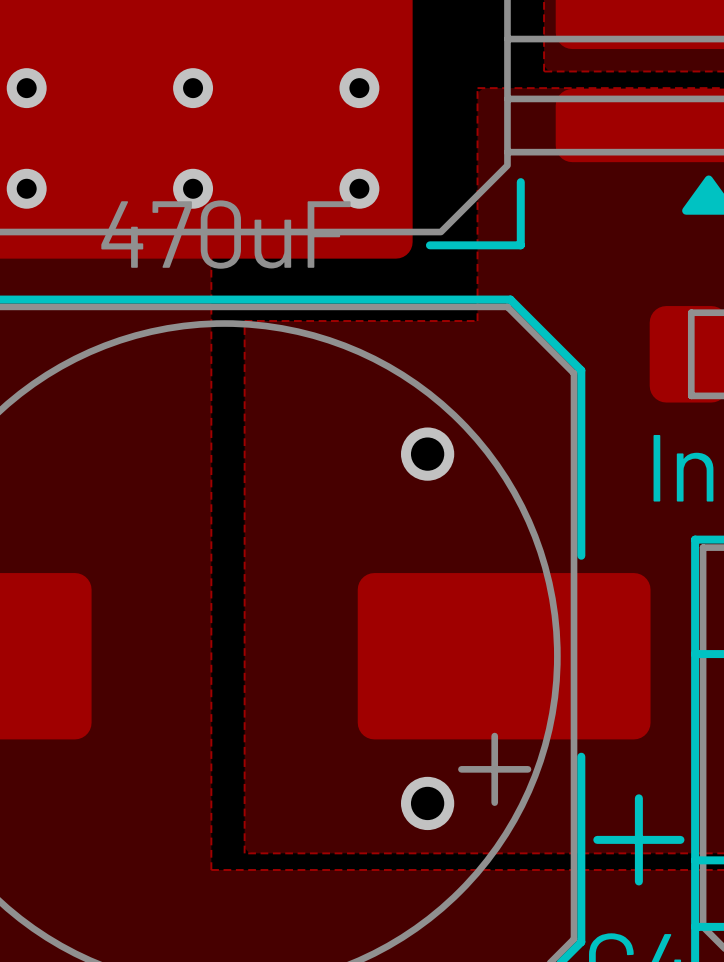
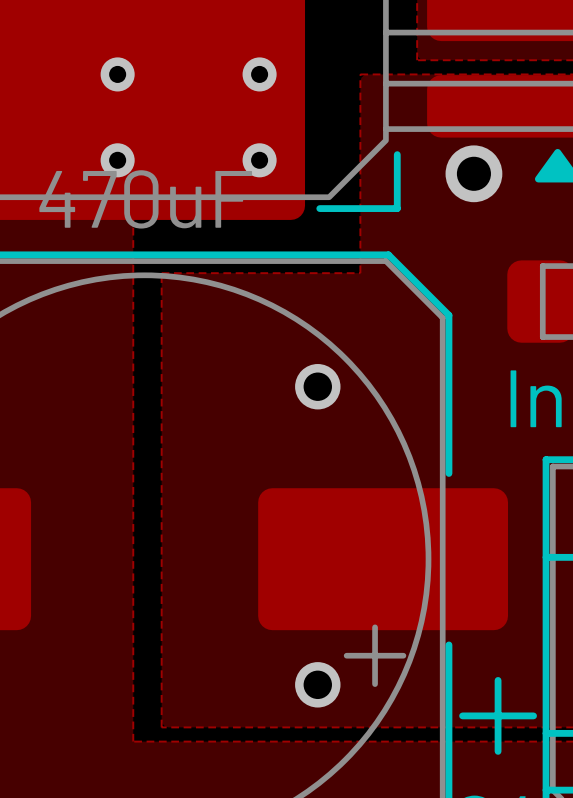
via: none -> (473, 173)

